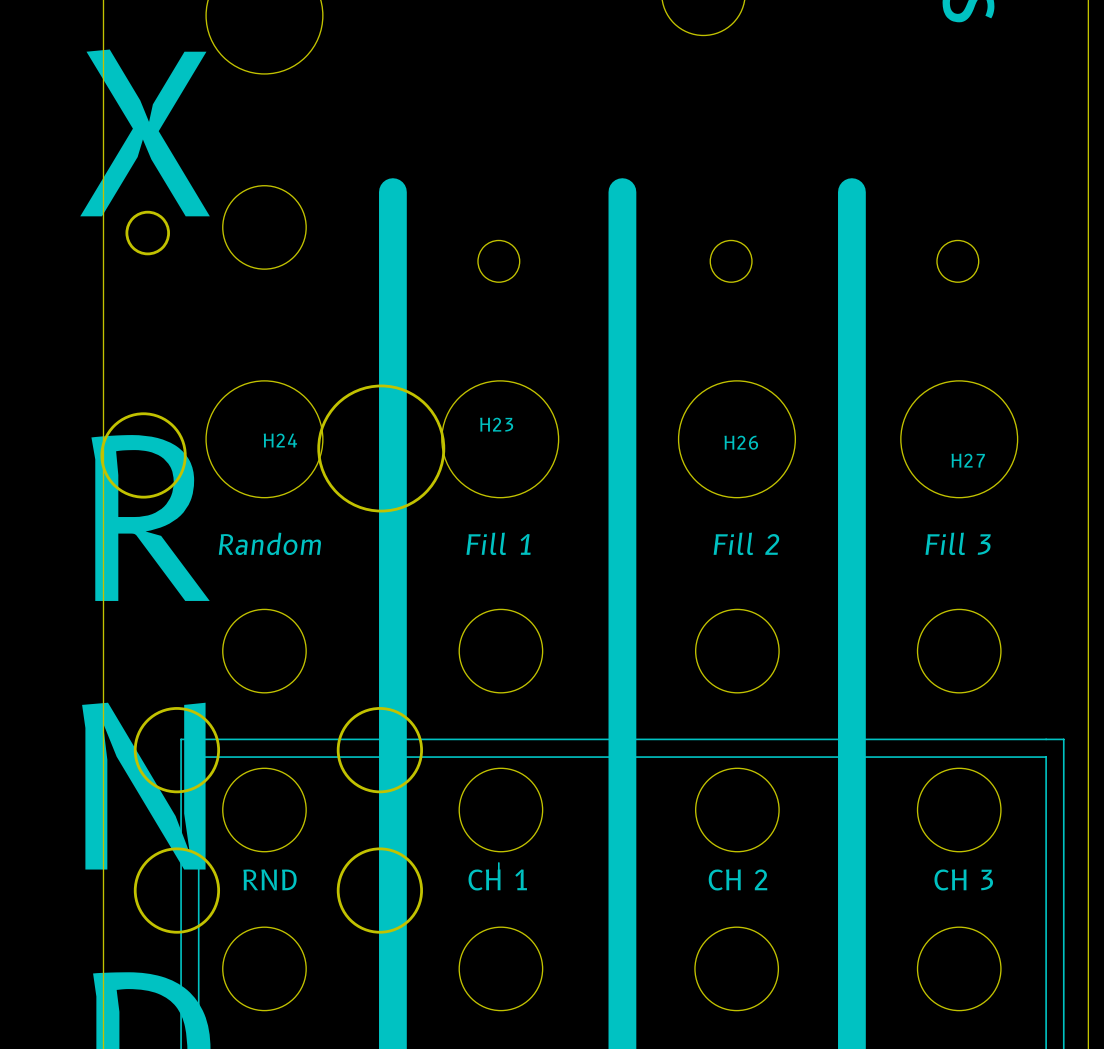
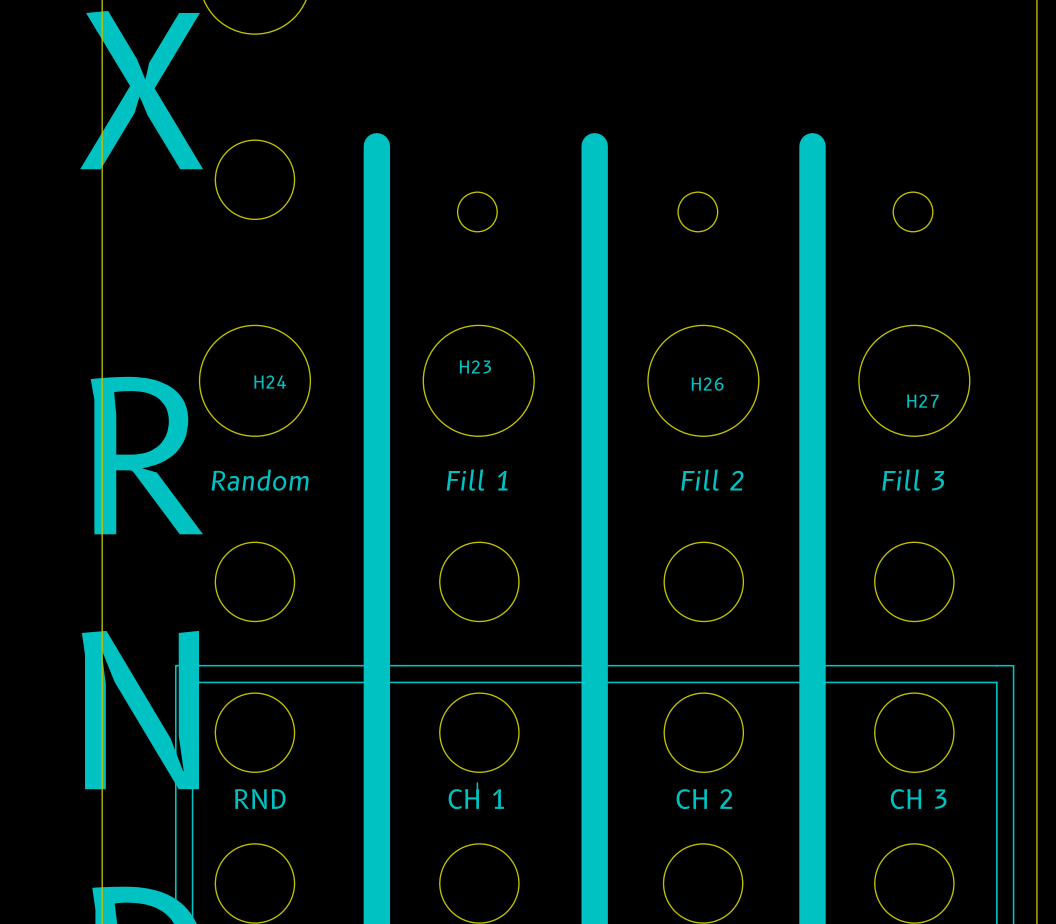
round board edge: [125, 210, 170, 256] -> none
round board edge: [317, 384, 446, 513] -> none
round board edge: [100, 412, 187, 499] -> none
round board edge: [133, 707, 221, 794] -> none
round board edge: [336, 707, 423, 794] -> none
round board edge: [133, 847, 221, 934] -> none
round board edge: [336, 847, 423, 934] -> none

